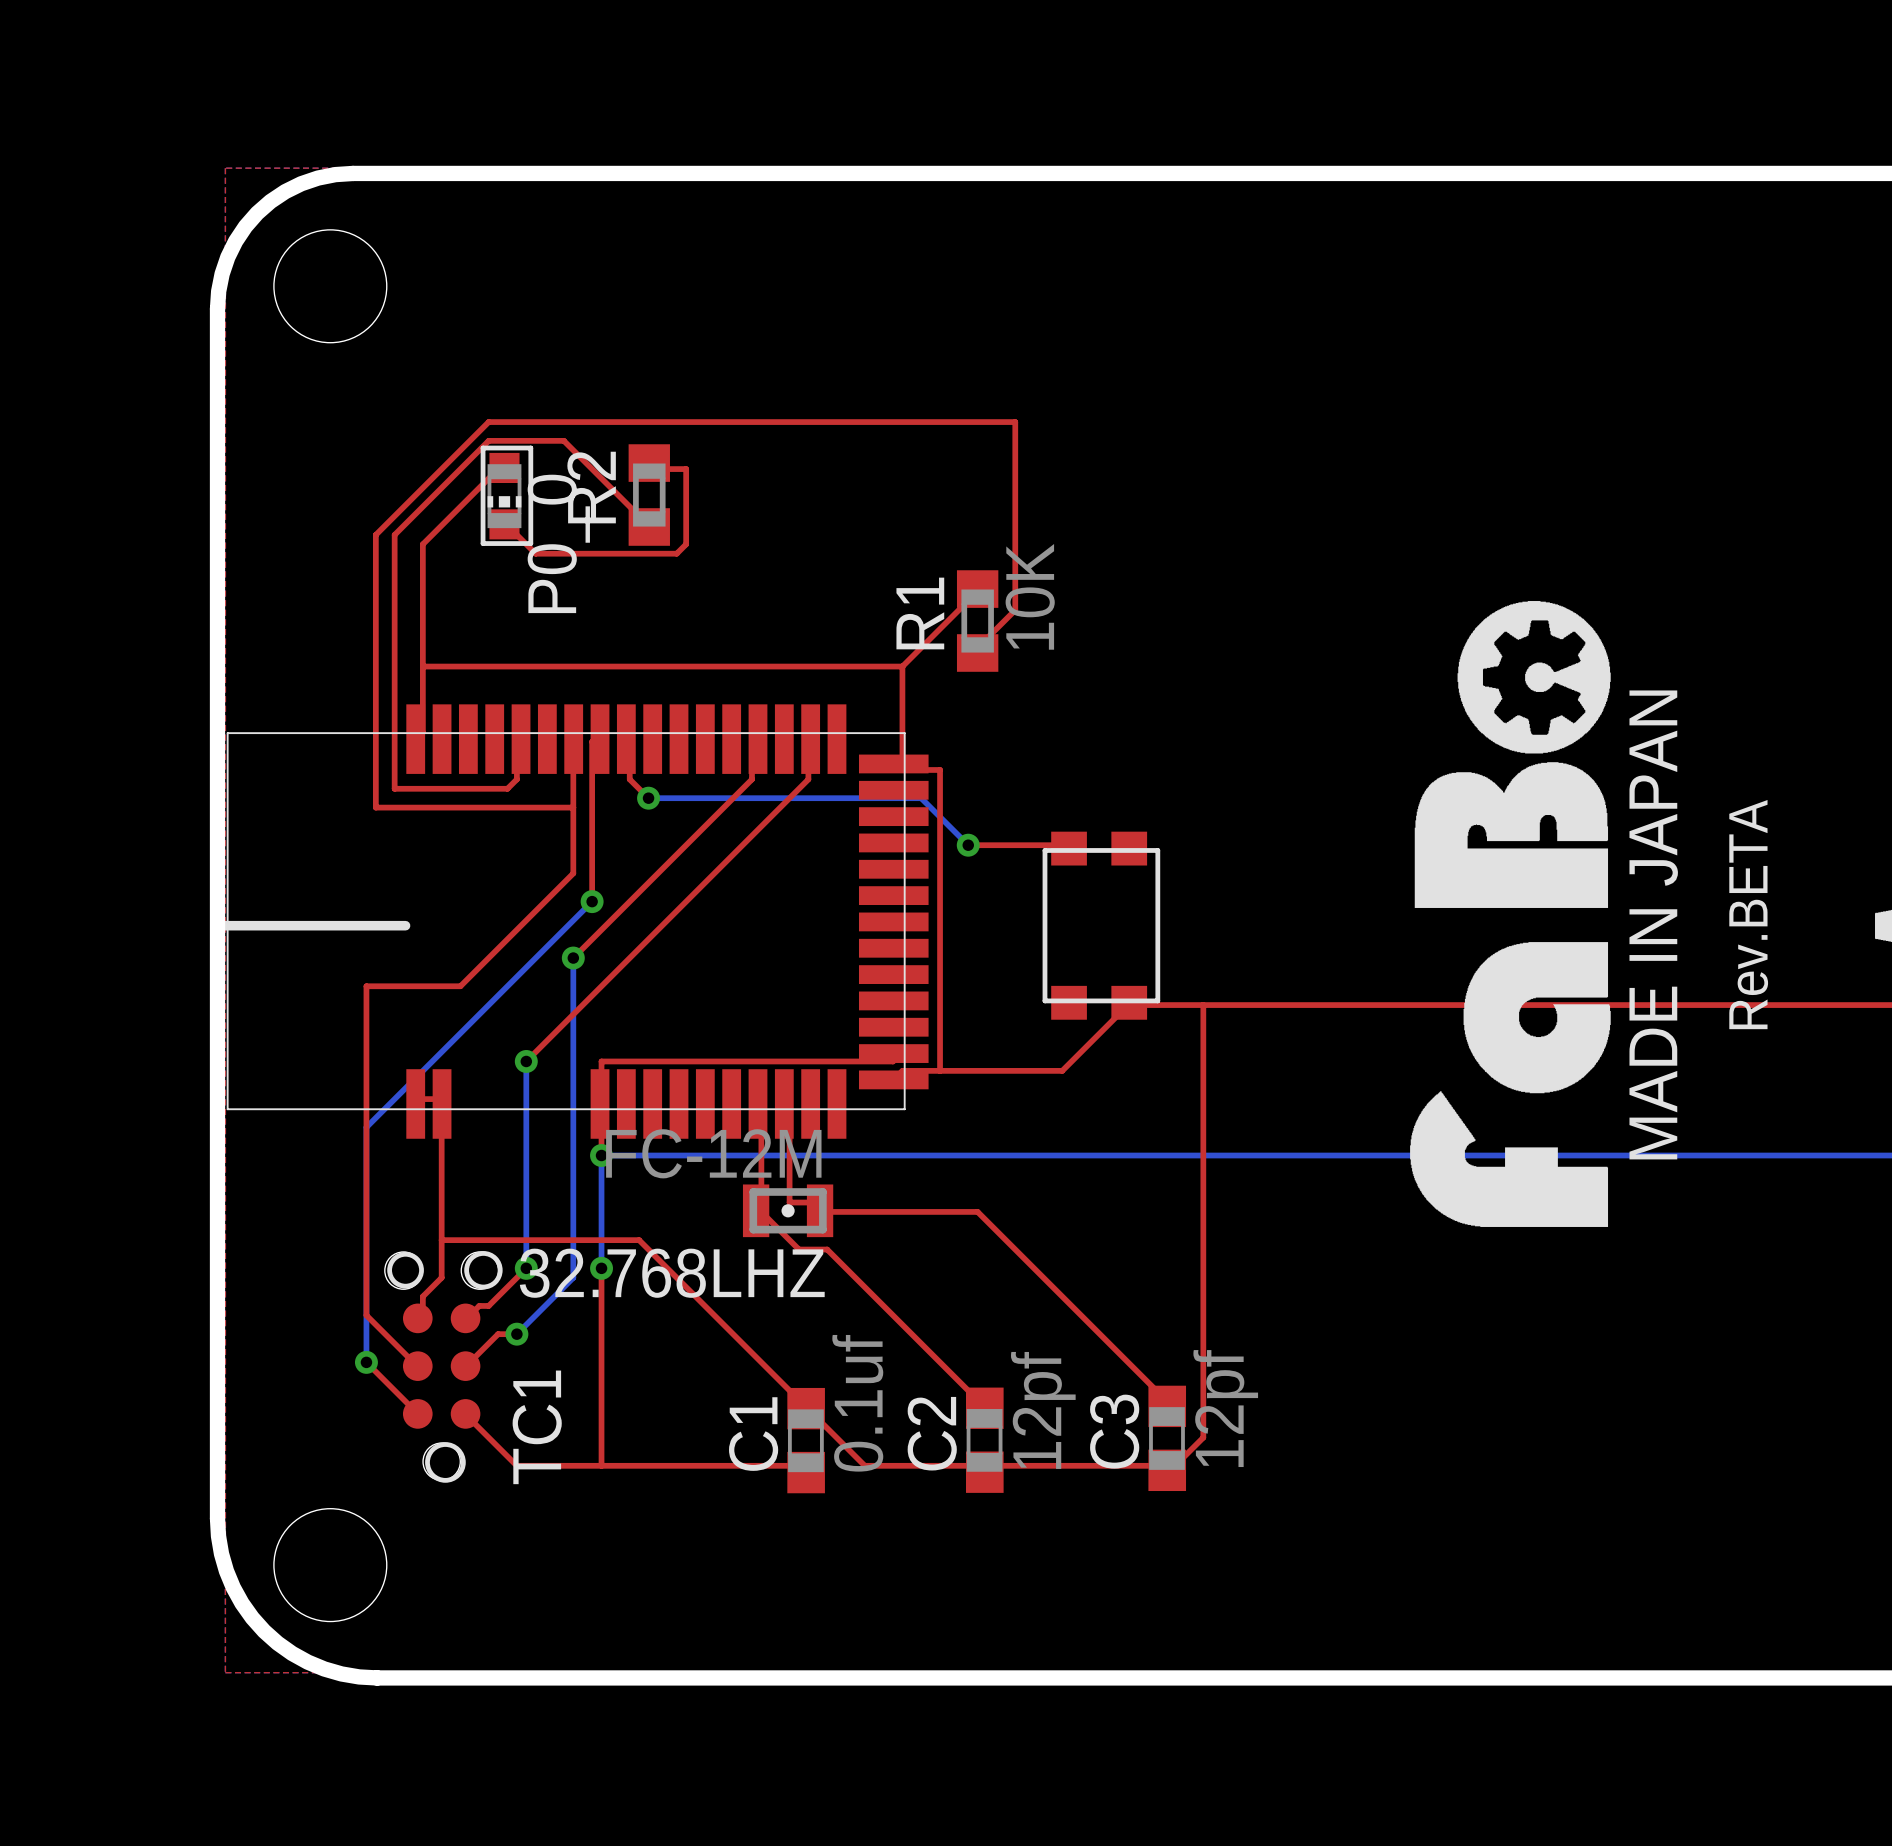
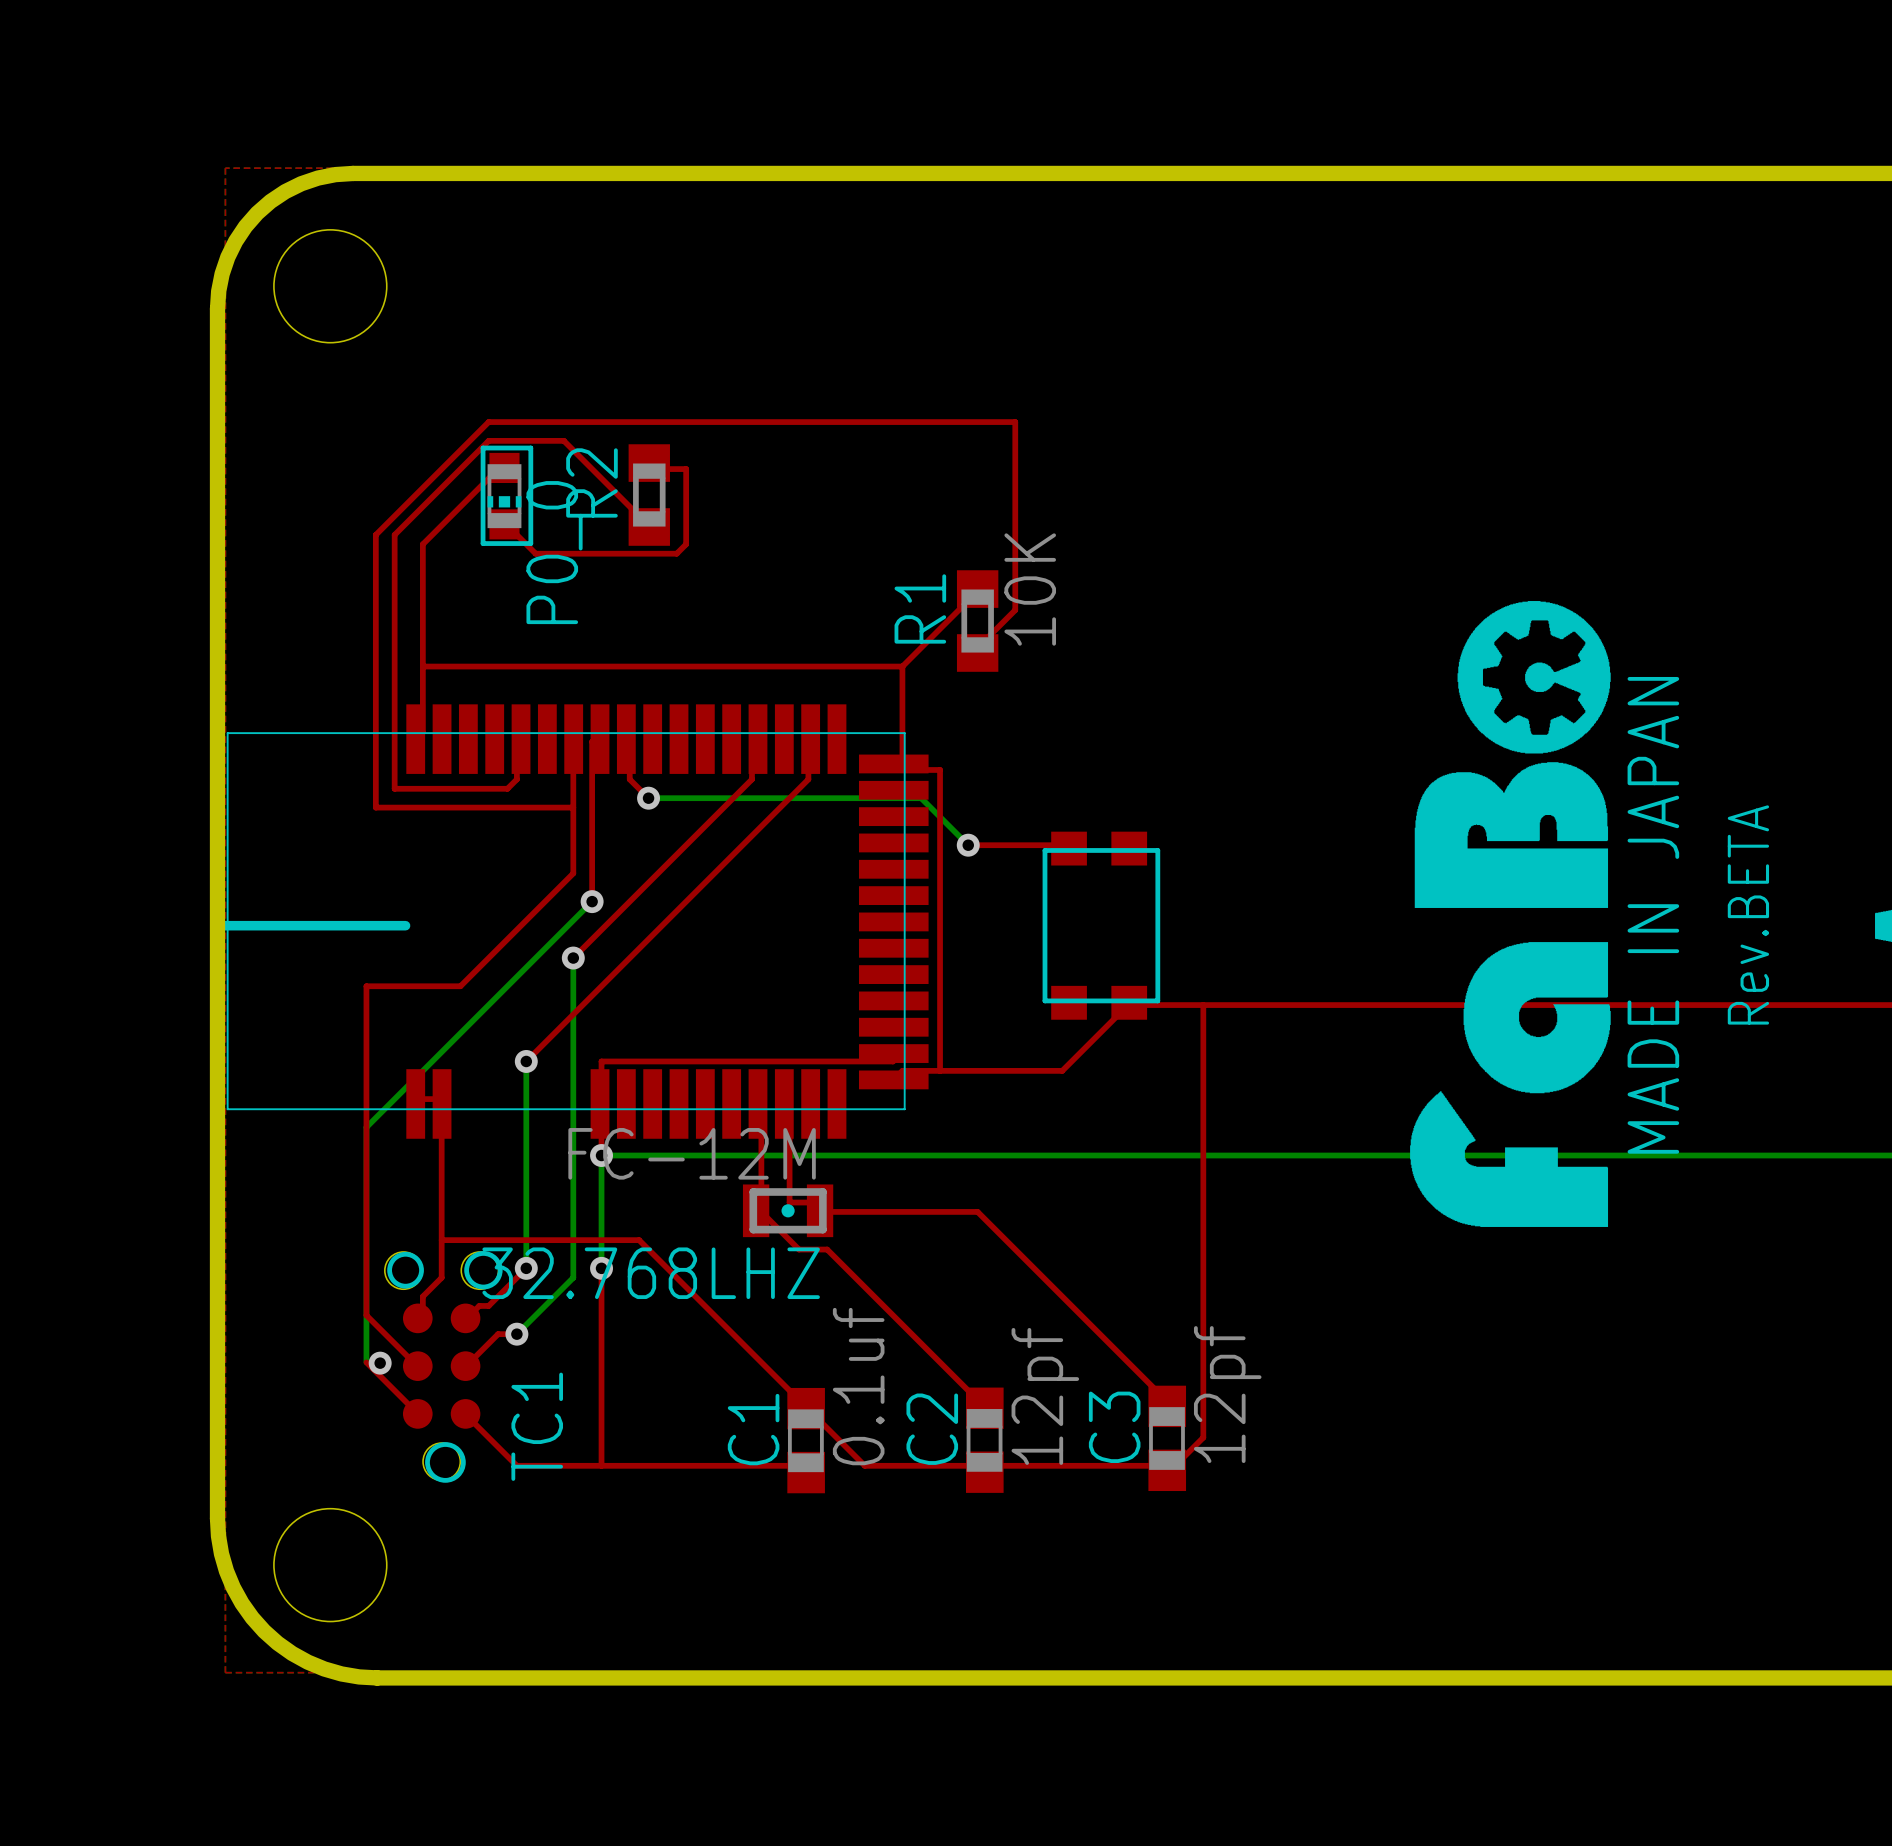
via position: (366, 1362) -> (380, 1363)

